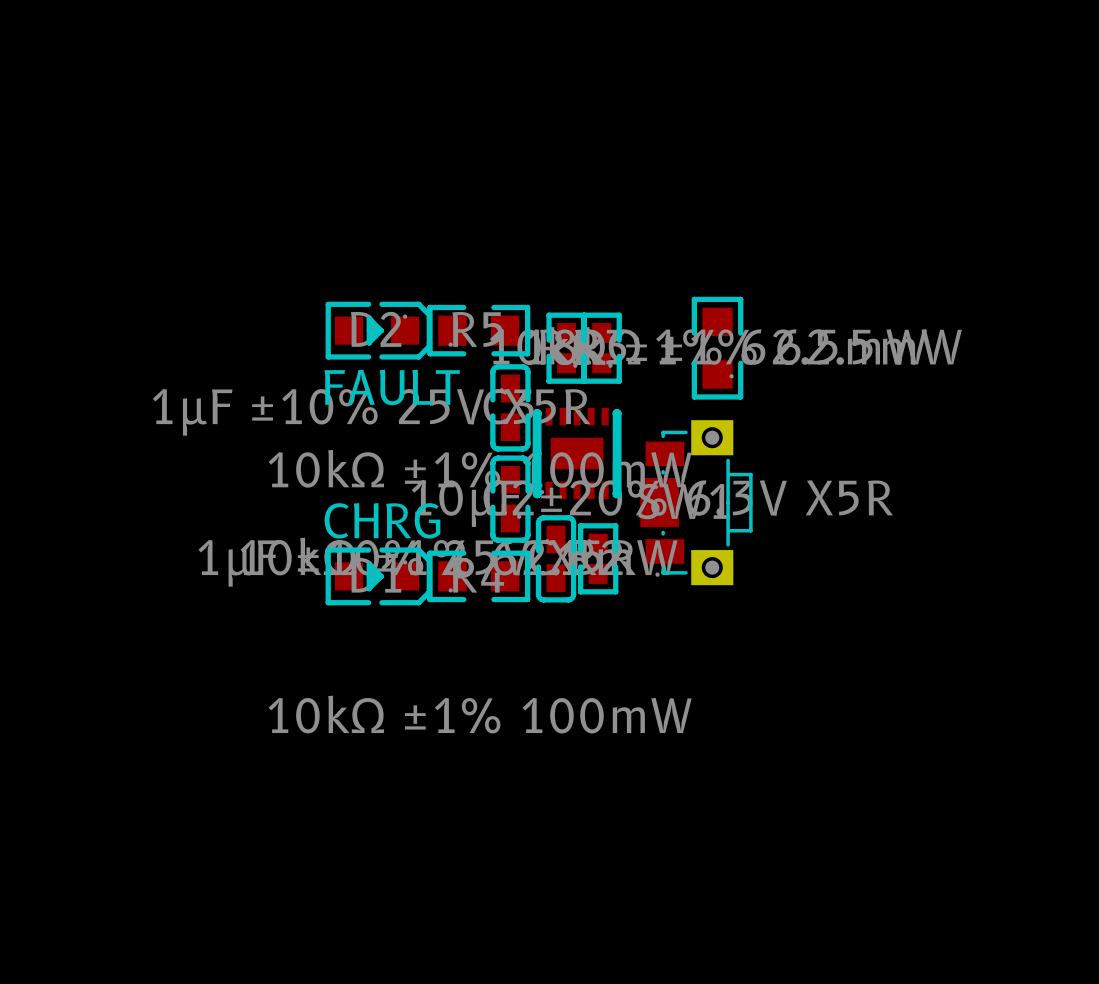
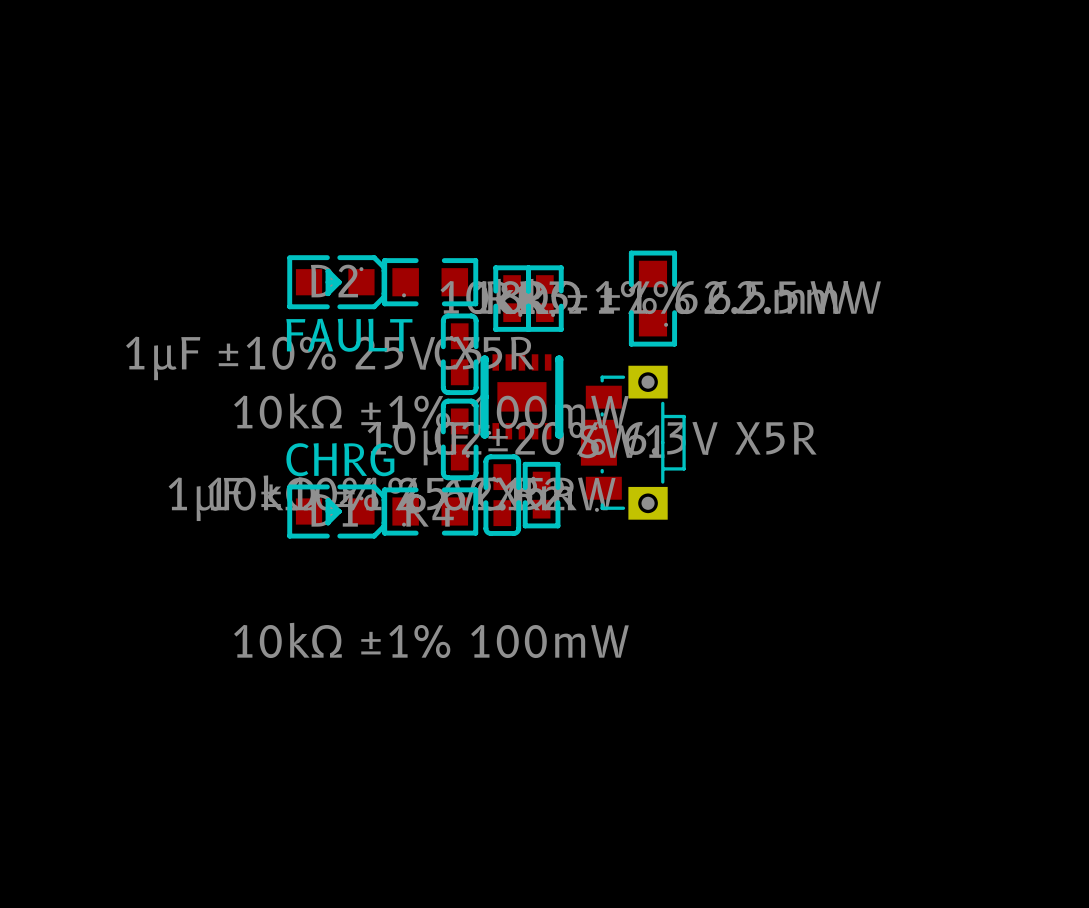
R5 name: R5 (477, 329) -> none

